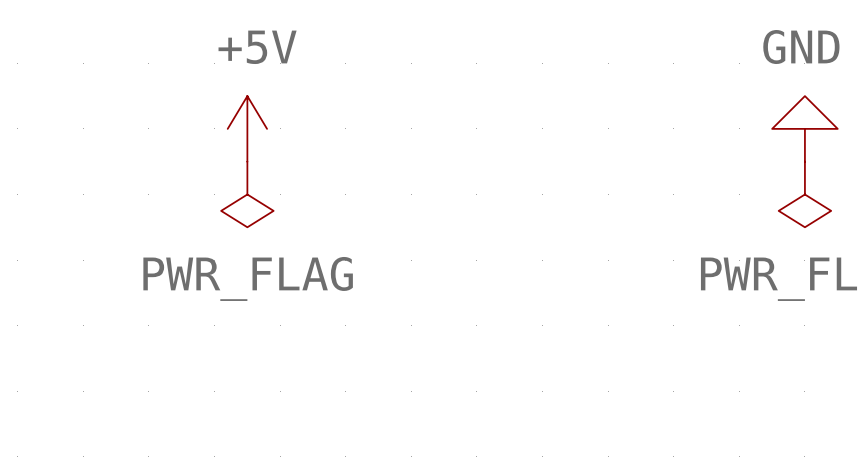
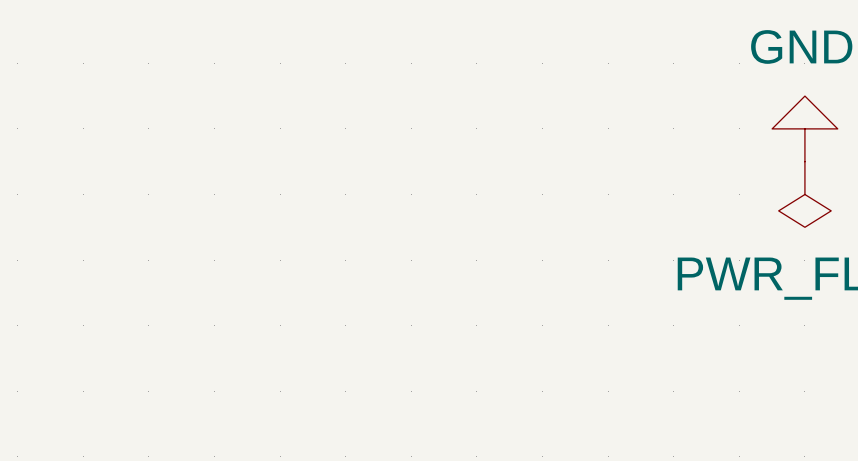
power symbol: +5V (247, 128) -> none
power symbol: PWR_FLAG (247, 194) -> none

